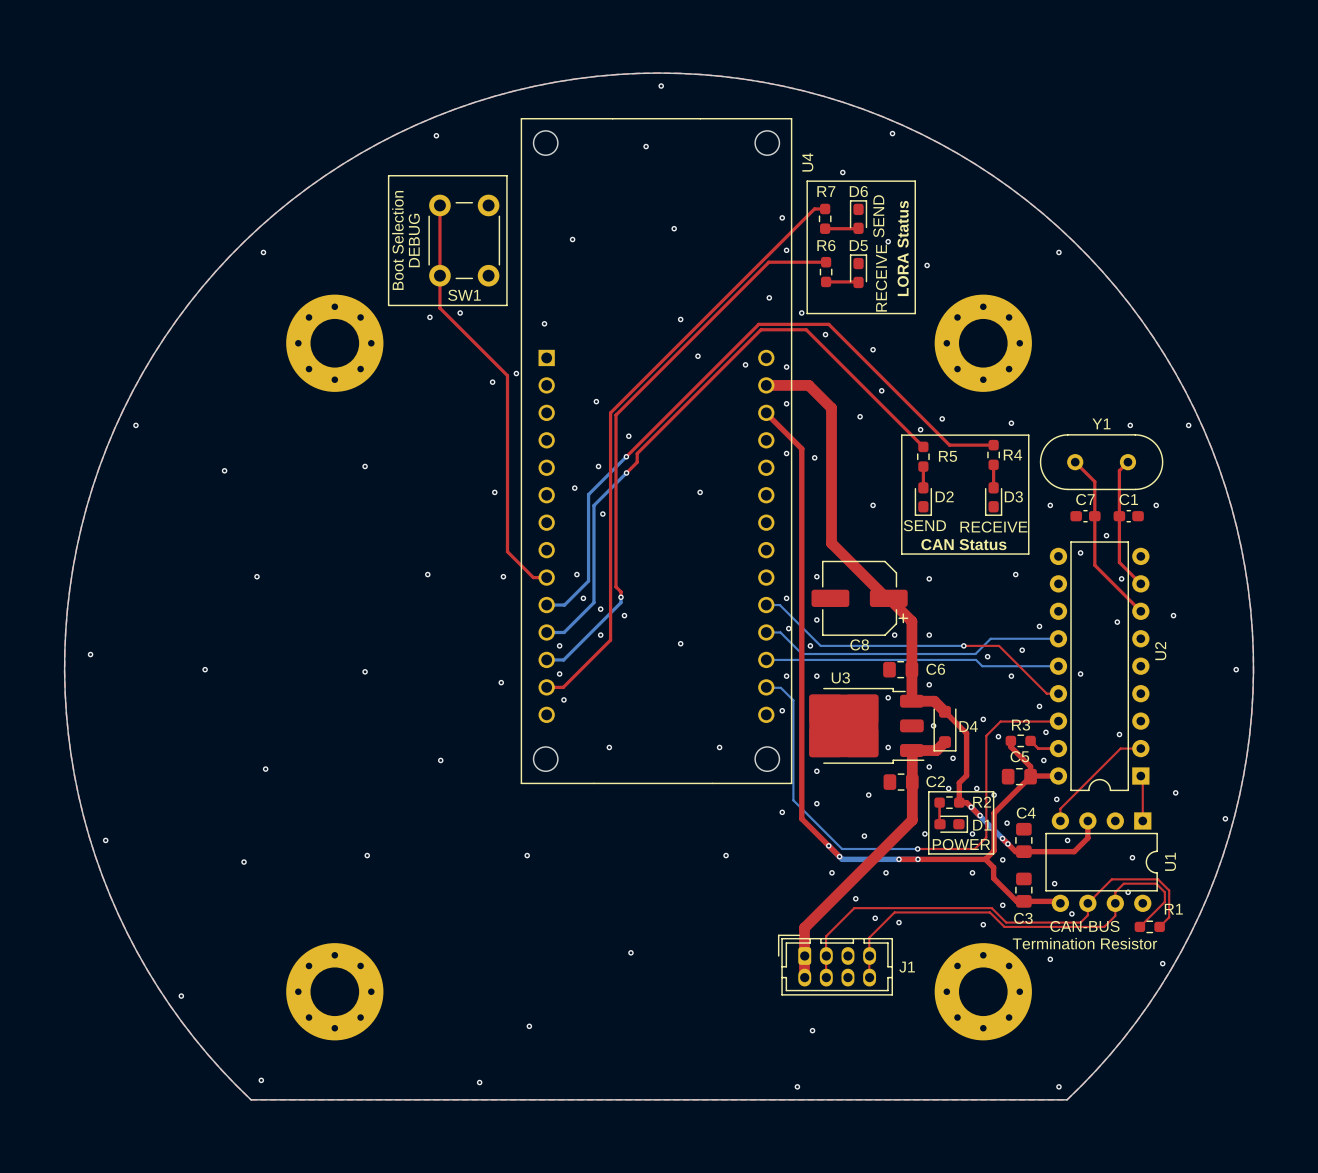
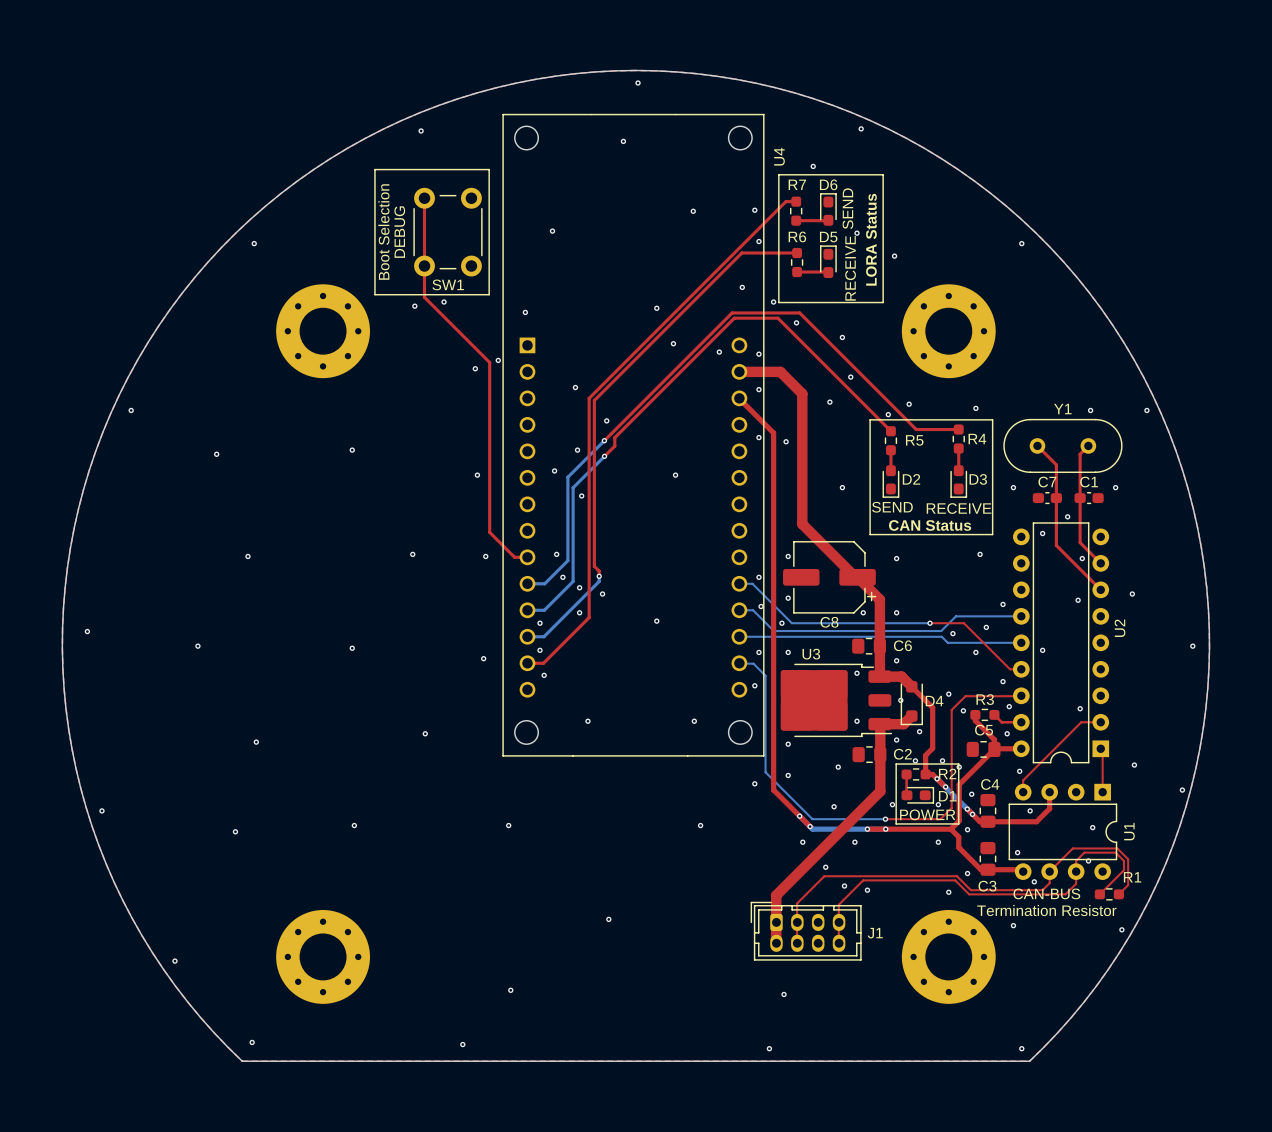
via position: (674, 228) -> (693, 211)

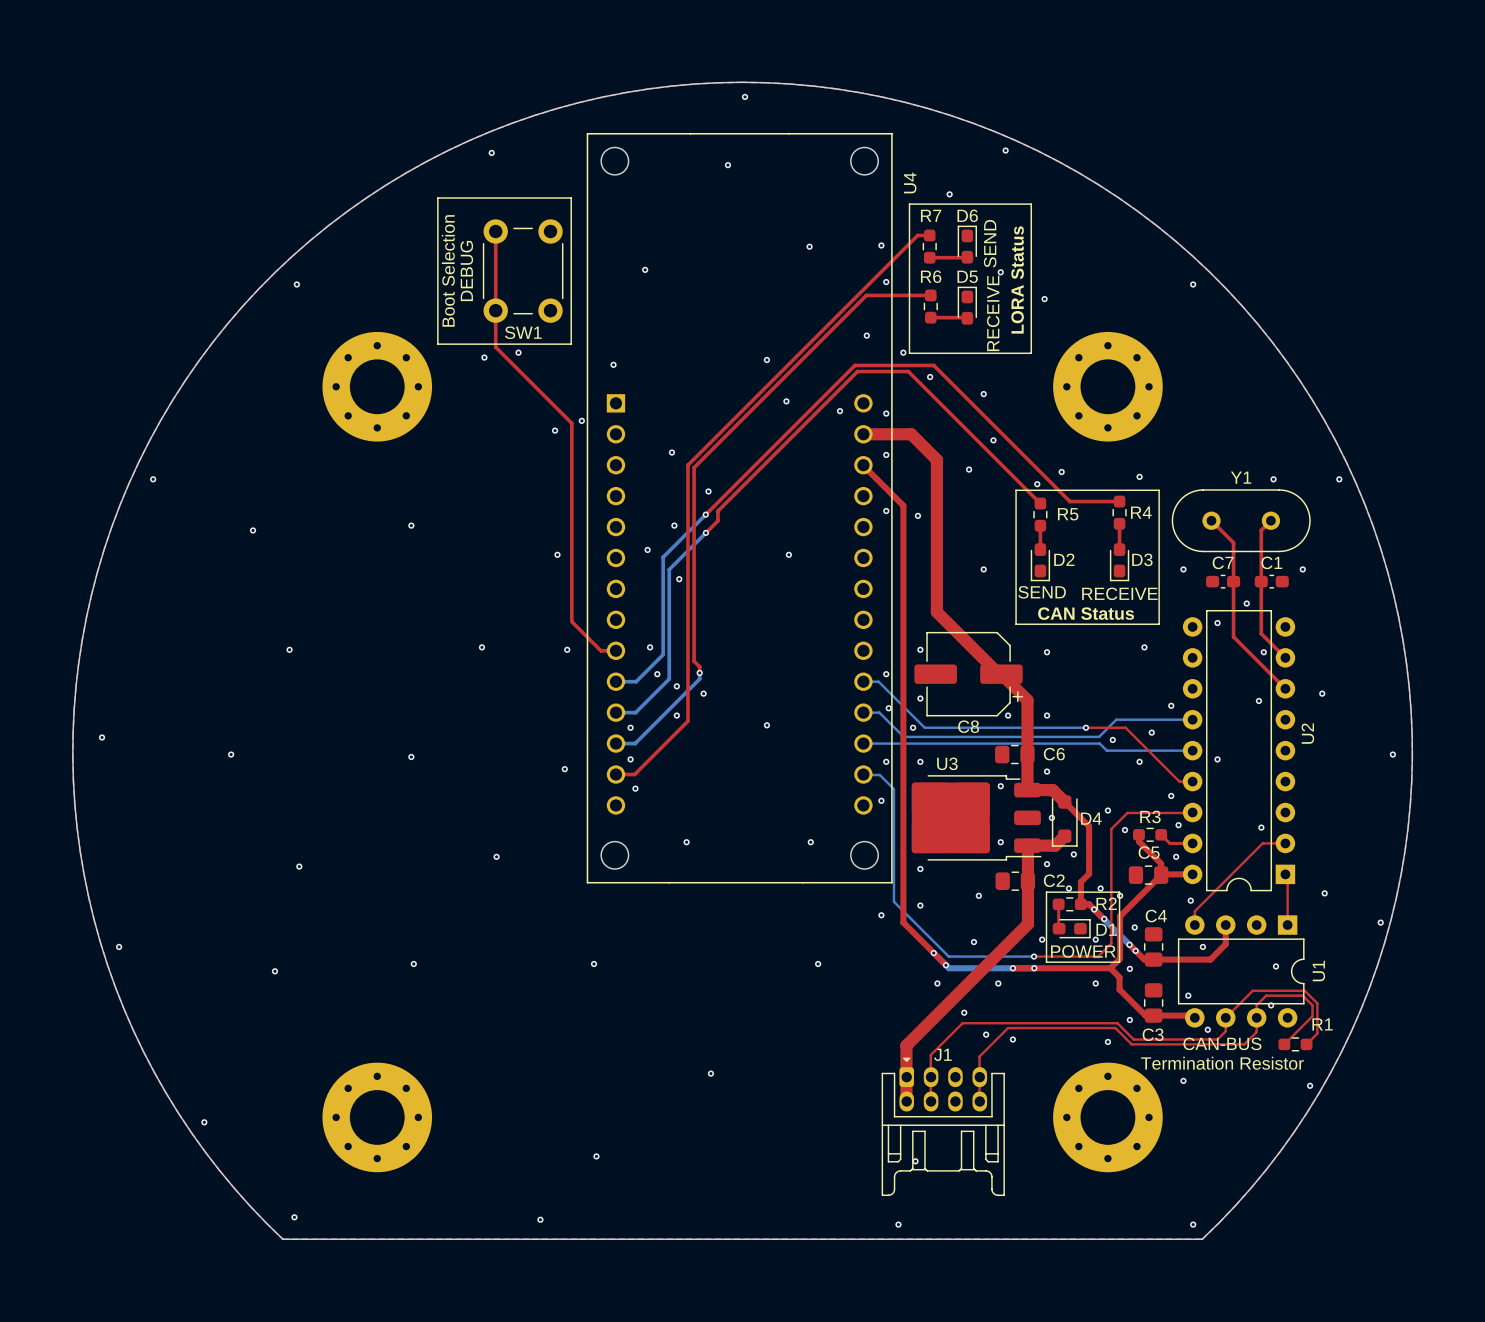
J1 footprint: [750, 901, 862, 961] -> [881, 1057, 1005, 1196]
J1 name position: J1 (875, 933) -> J1 (942, 1054)

